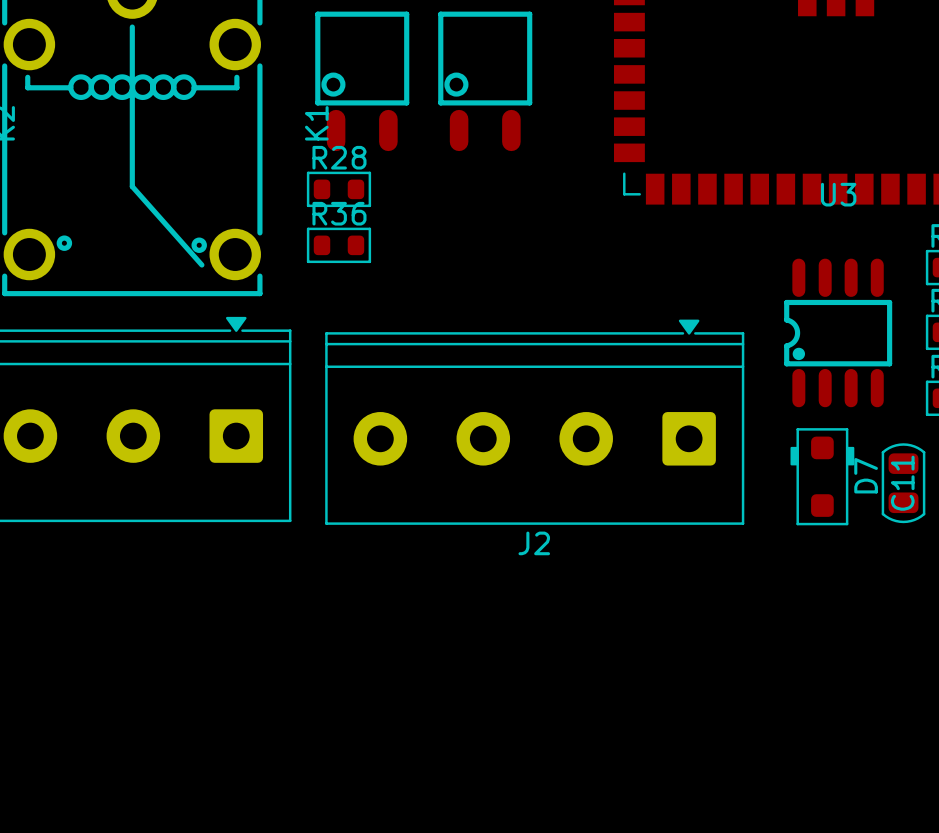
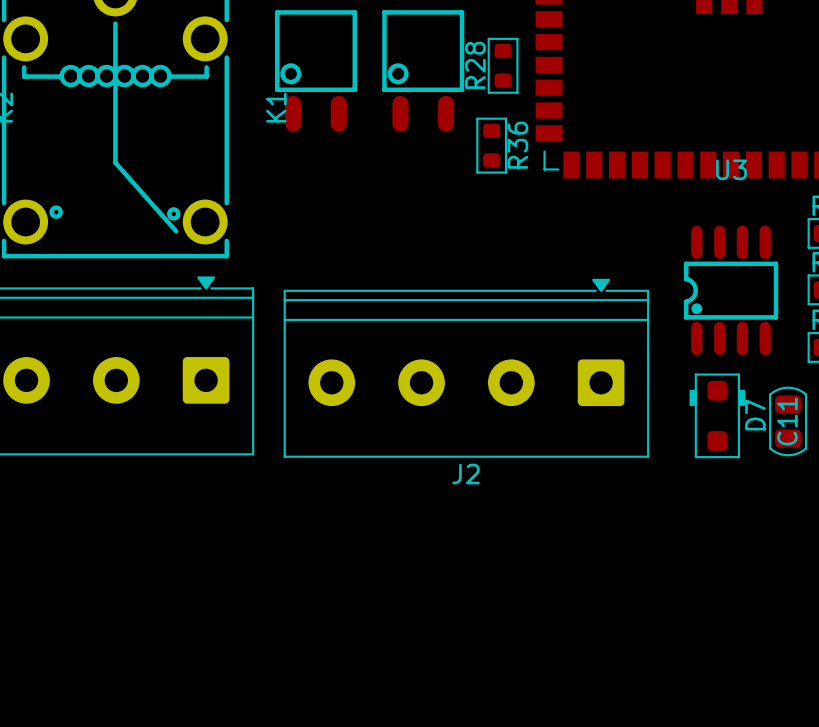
R28 name position: R28 (339, 157) -> R28 (475, 65)
R28 rotation: 0° (338, 189) -> 90° clockwise (503, 65)
R28 position: (338, 189) -> (503, 65)
R36 rotation: 0° (338, 245) -> 90° clockwise (491, 145)
R36 position: (338, 245) -> (491, 145)

